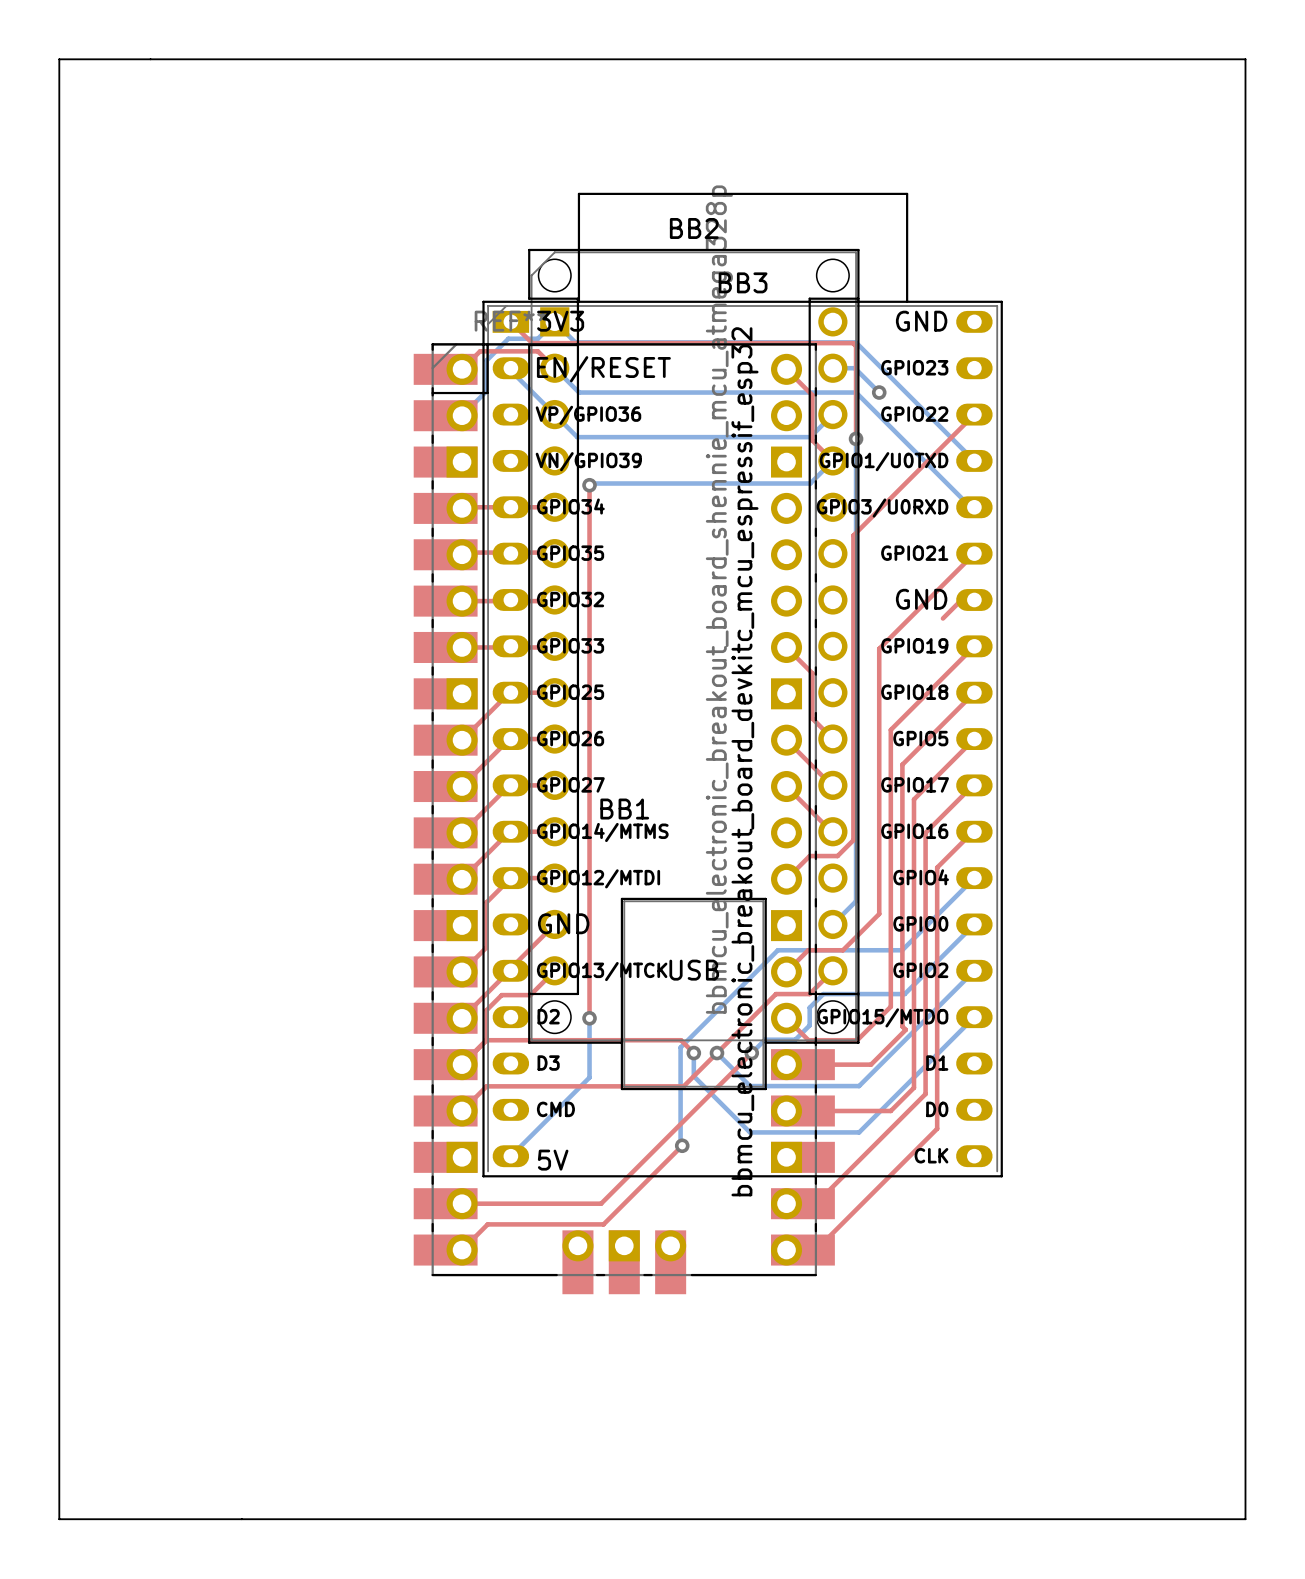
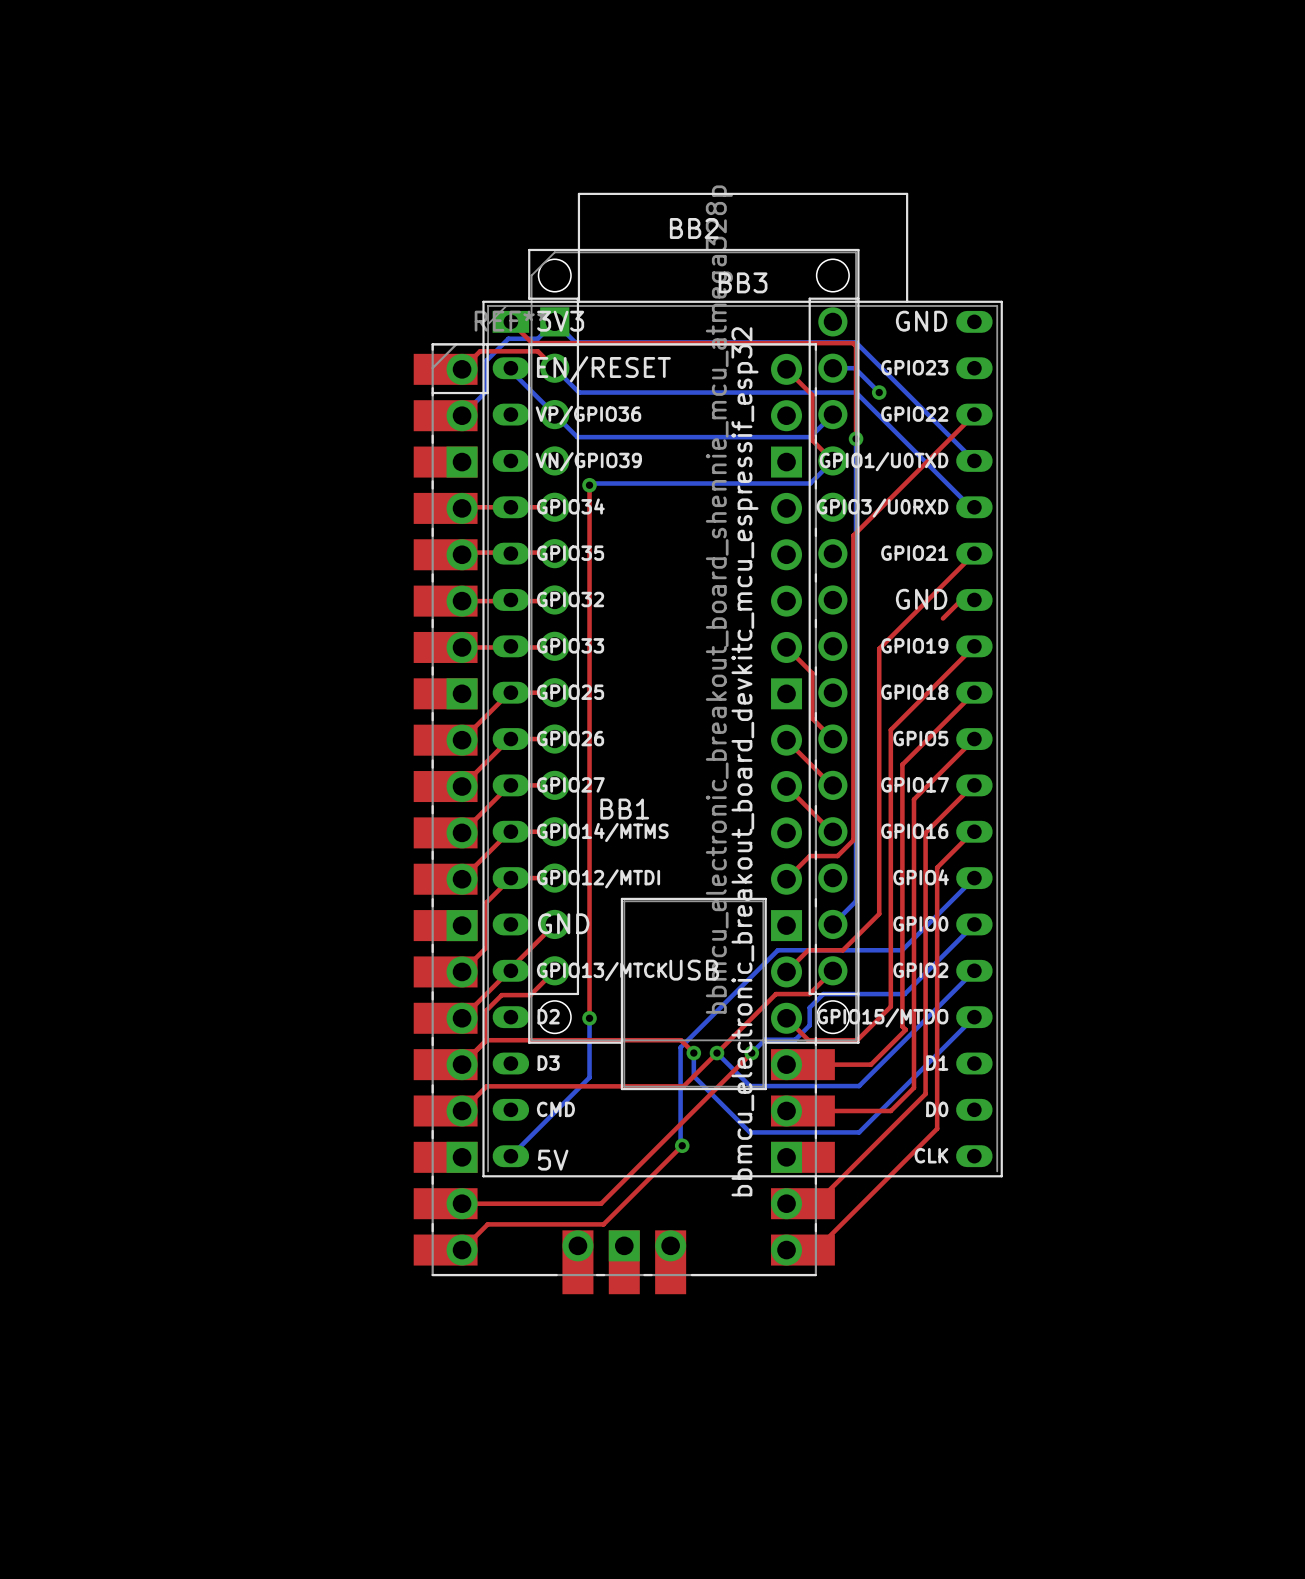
board edge: (59, 59) (1245, 59) (1245, 1519) (59, 1519) (59, 59) -> none

